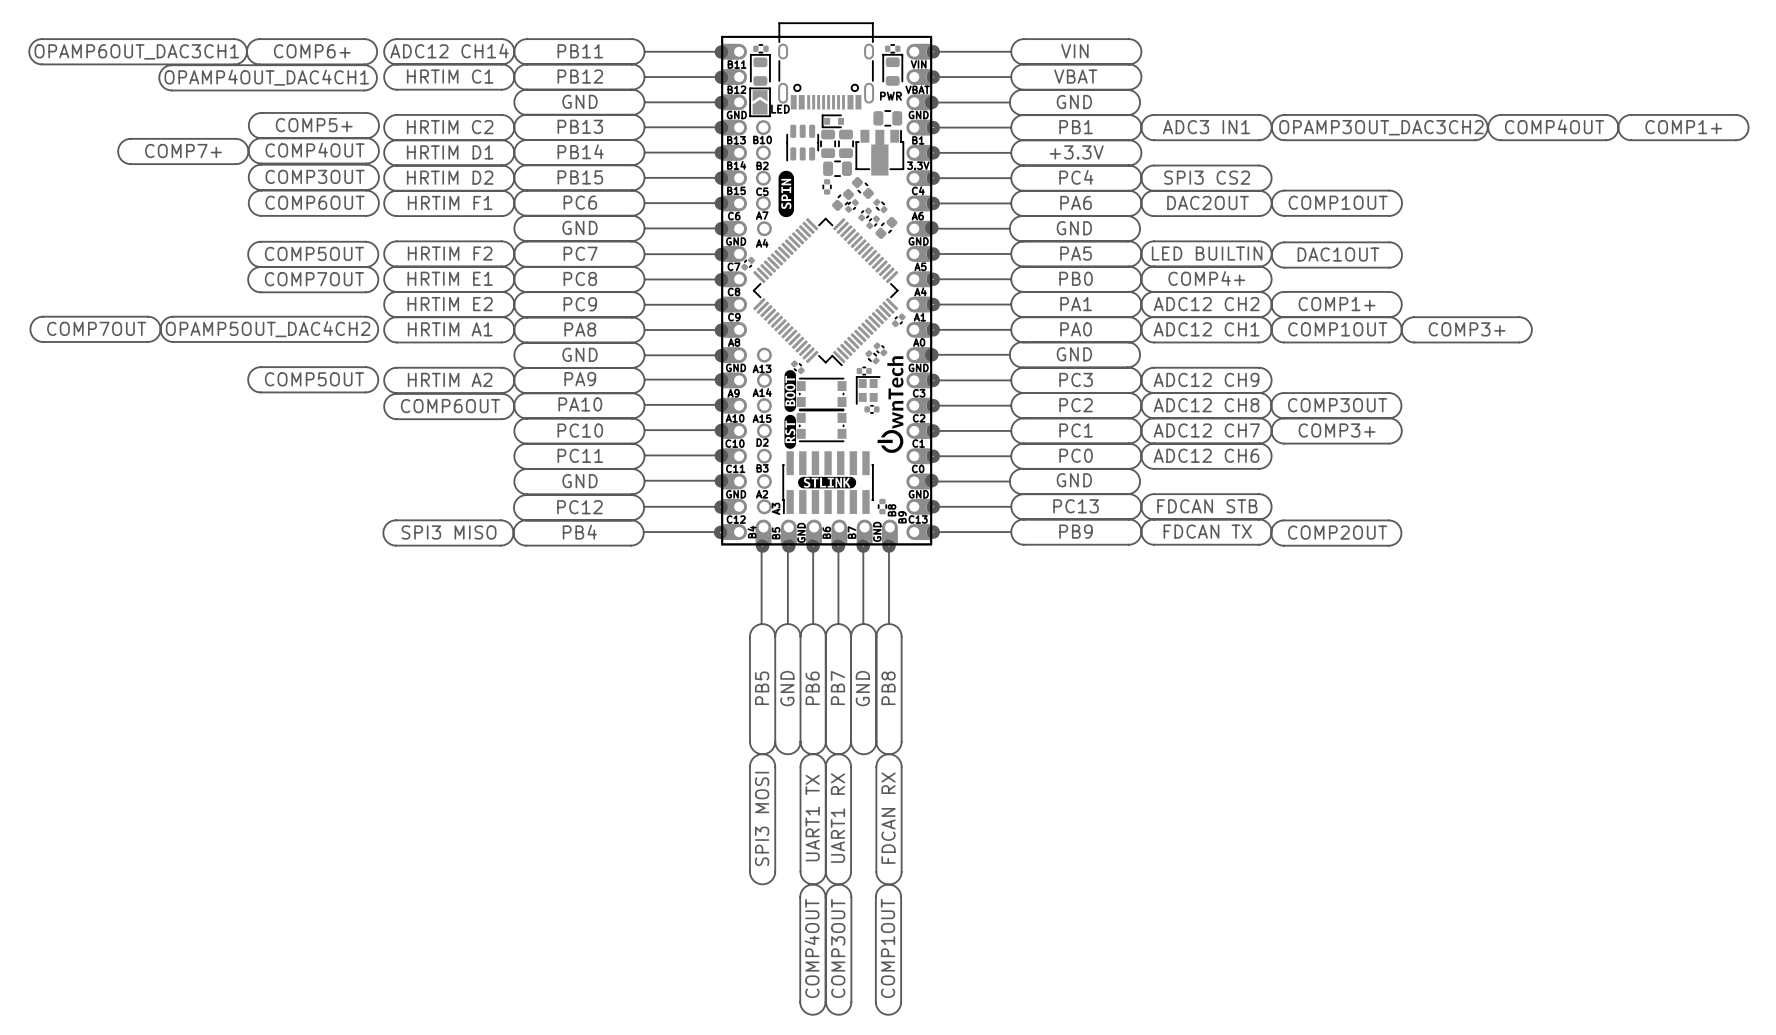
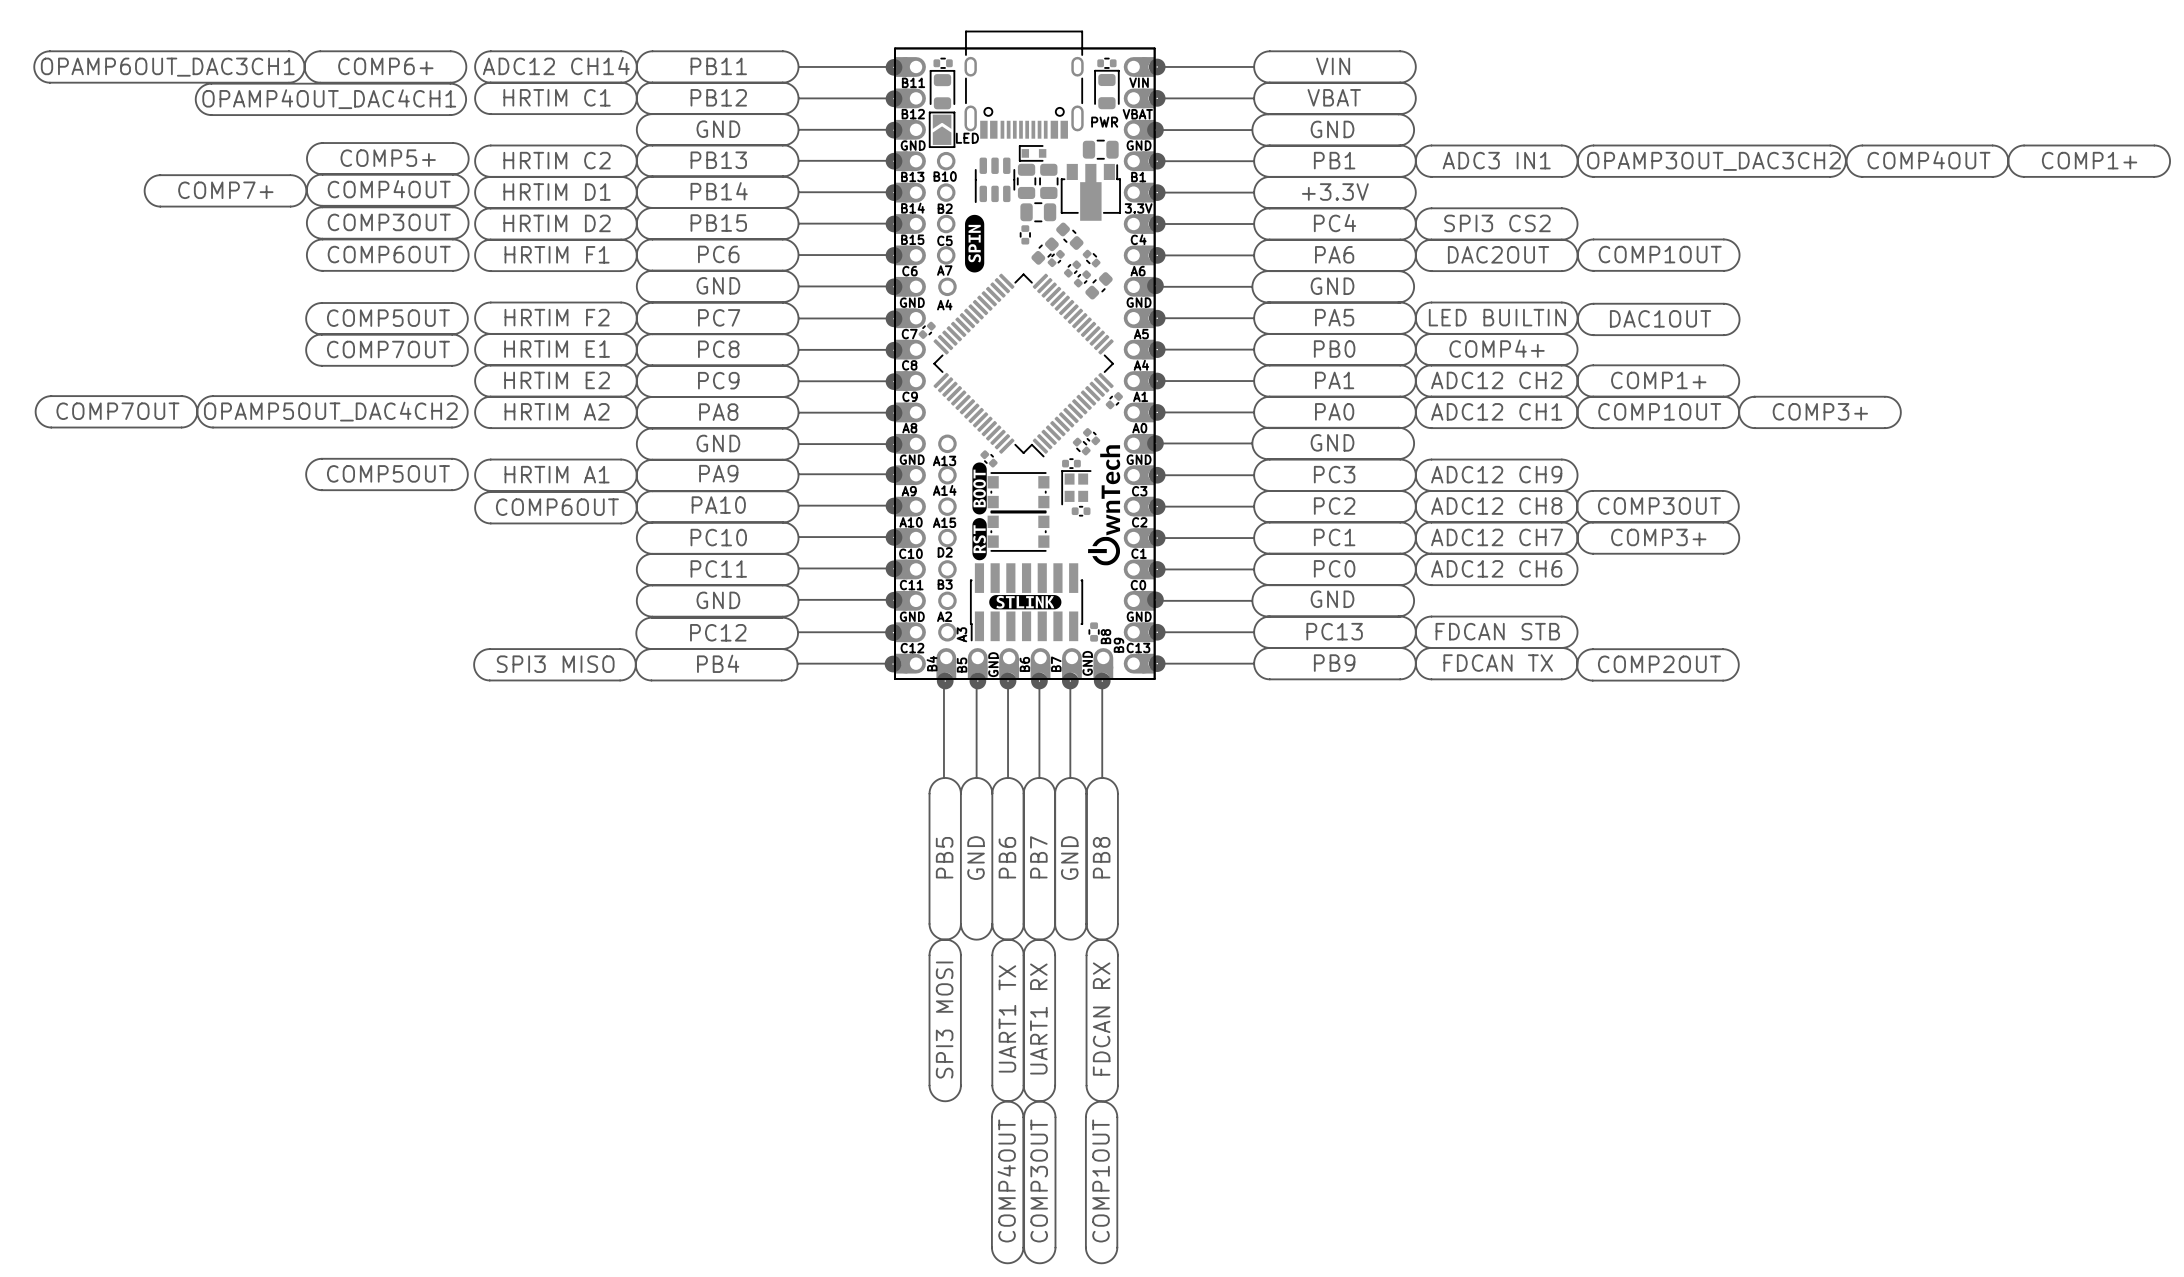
text: HRTIM A1 (450, 329) -> HRTIM A2 (557, 411)
text: HRTIM A2 (450, 379) -> HRTIM A1 (557, 474)

